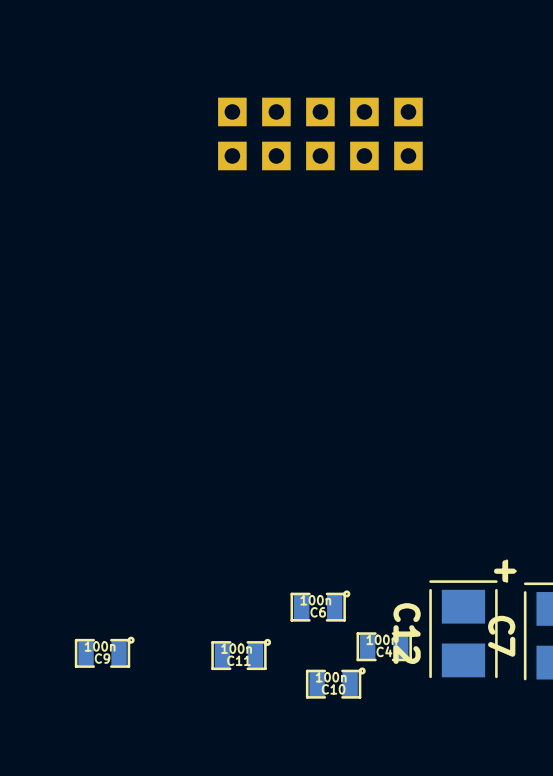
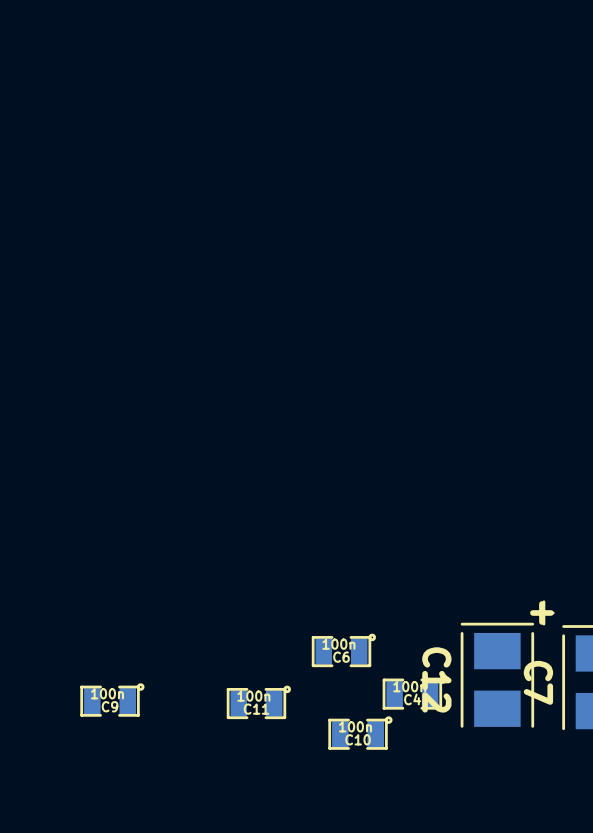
part: (320, 133) -> none

